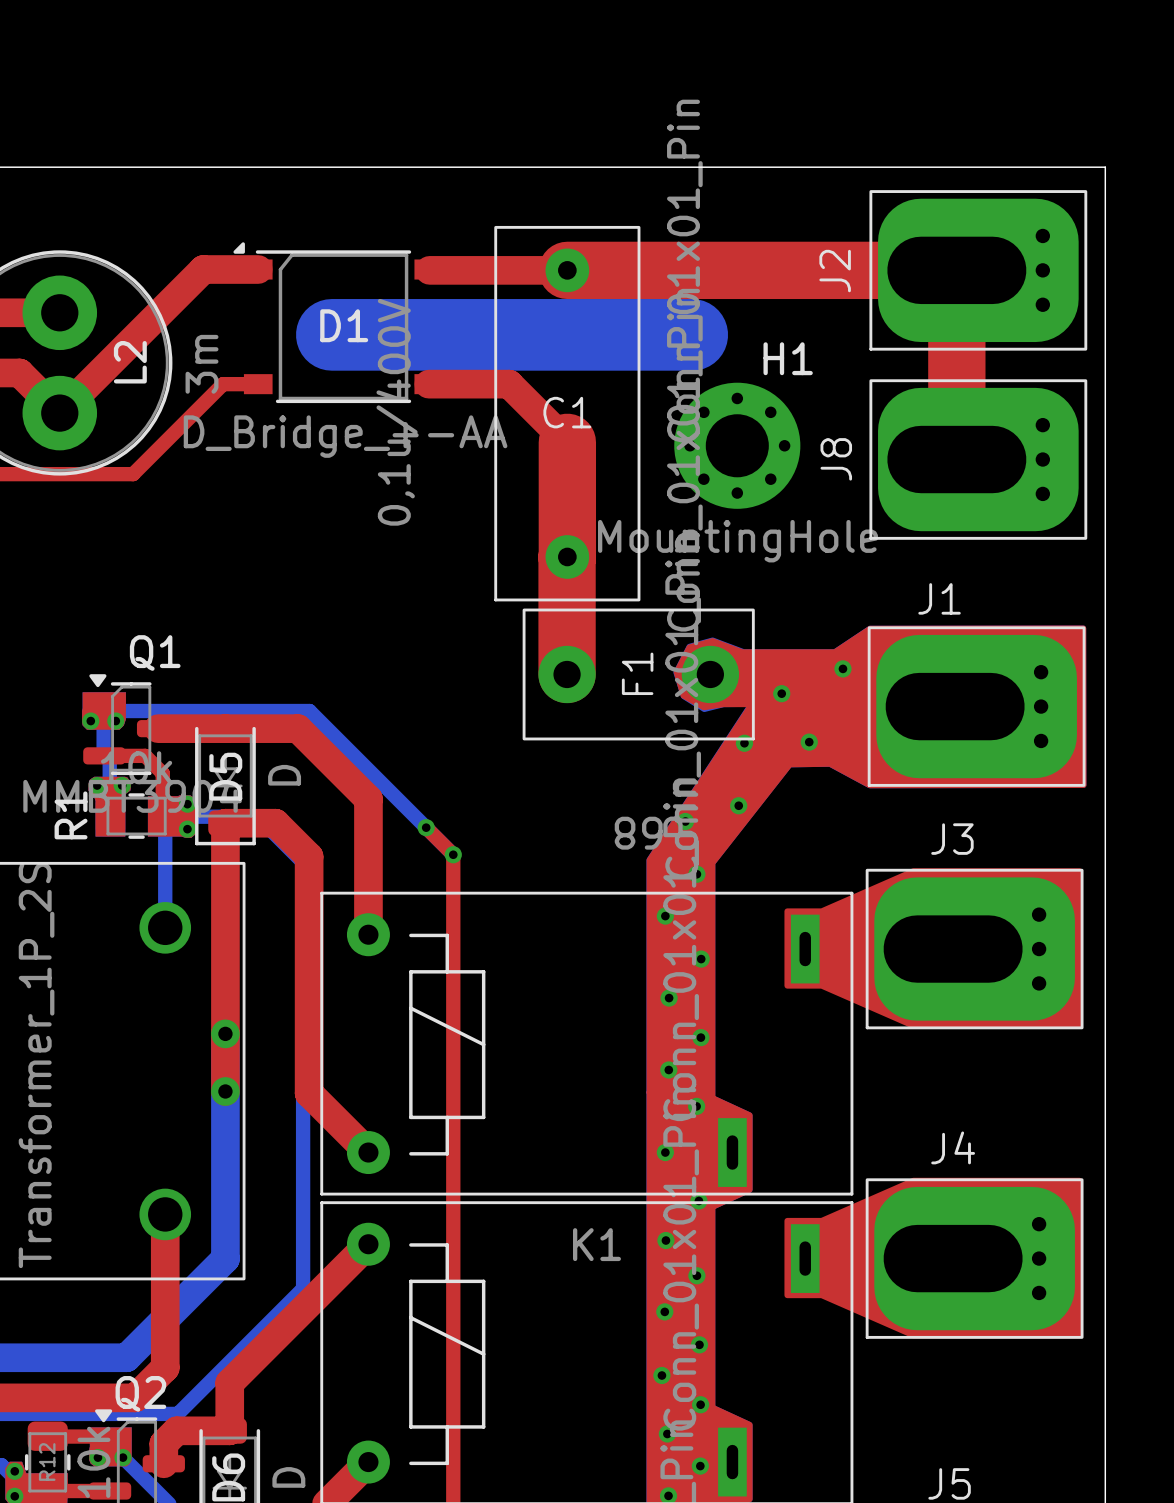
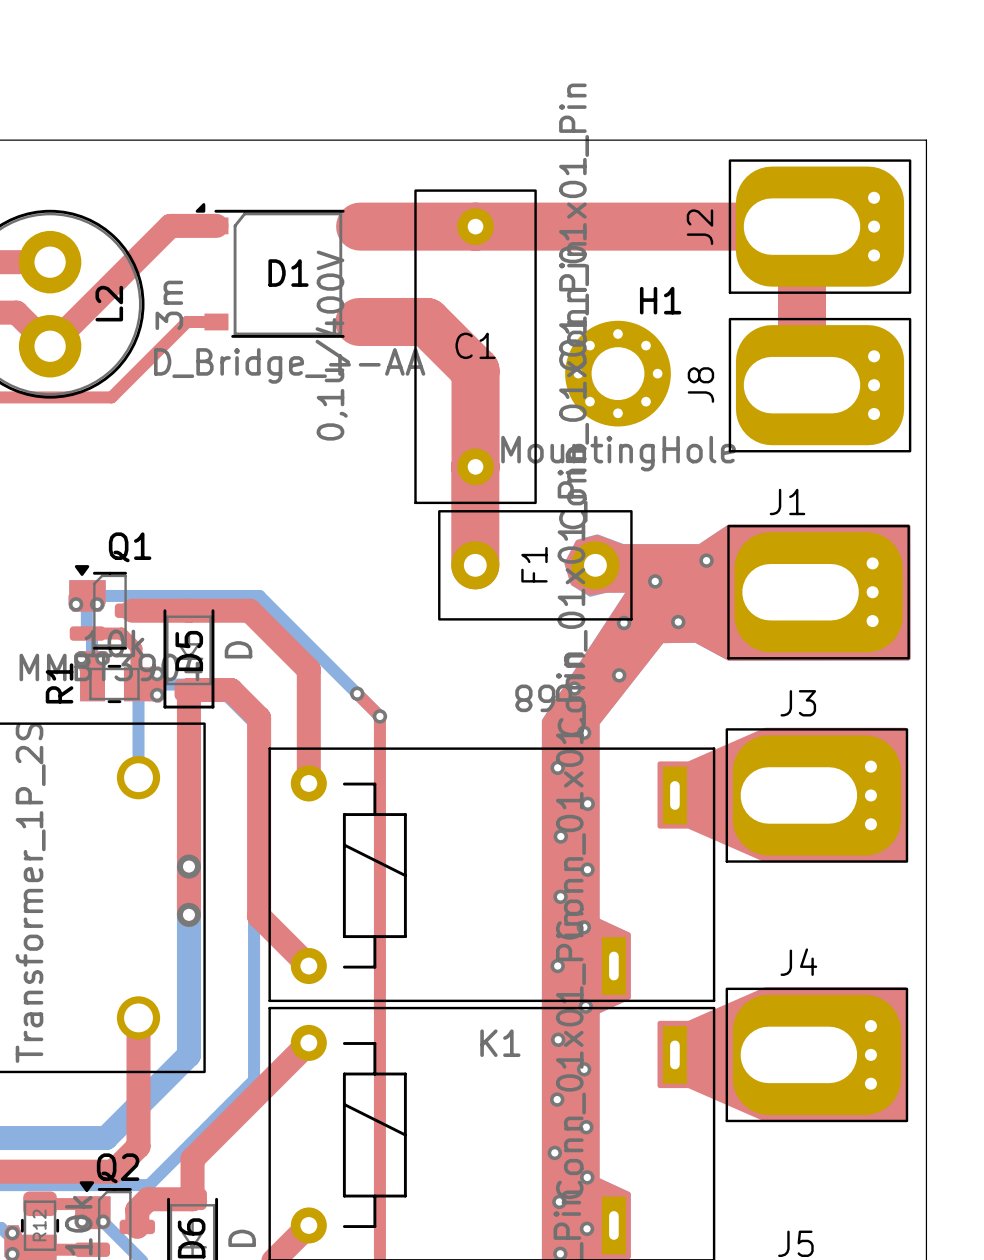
top track width: thin (429, 270) (567, 270) -> thick (360, 226) (475, 226)
bottom track: (331, 334) (692, 334) -> none
top track width: thin (428, 384) (509, 384) (567, 442) -> thick (359, 321) (426, 321) (475, 370)

